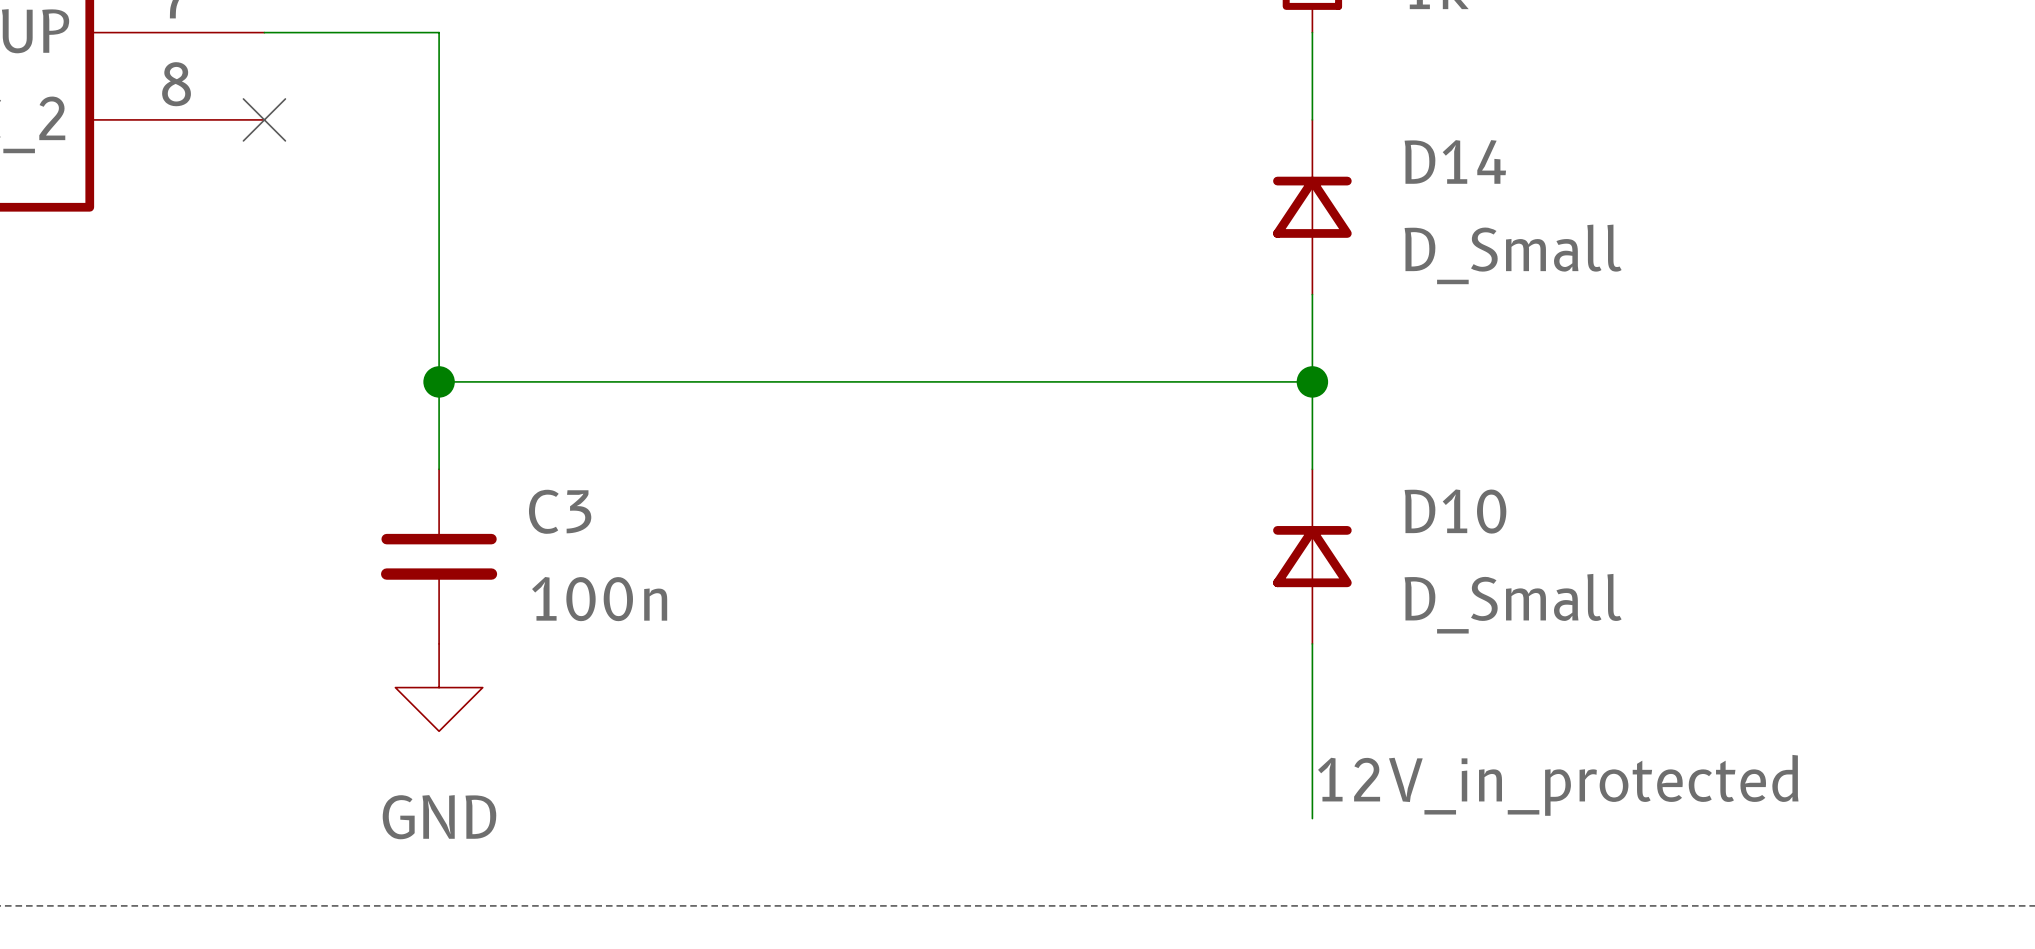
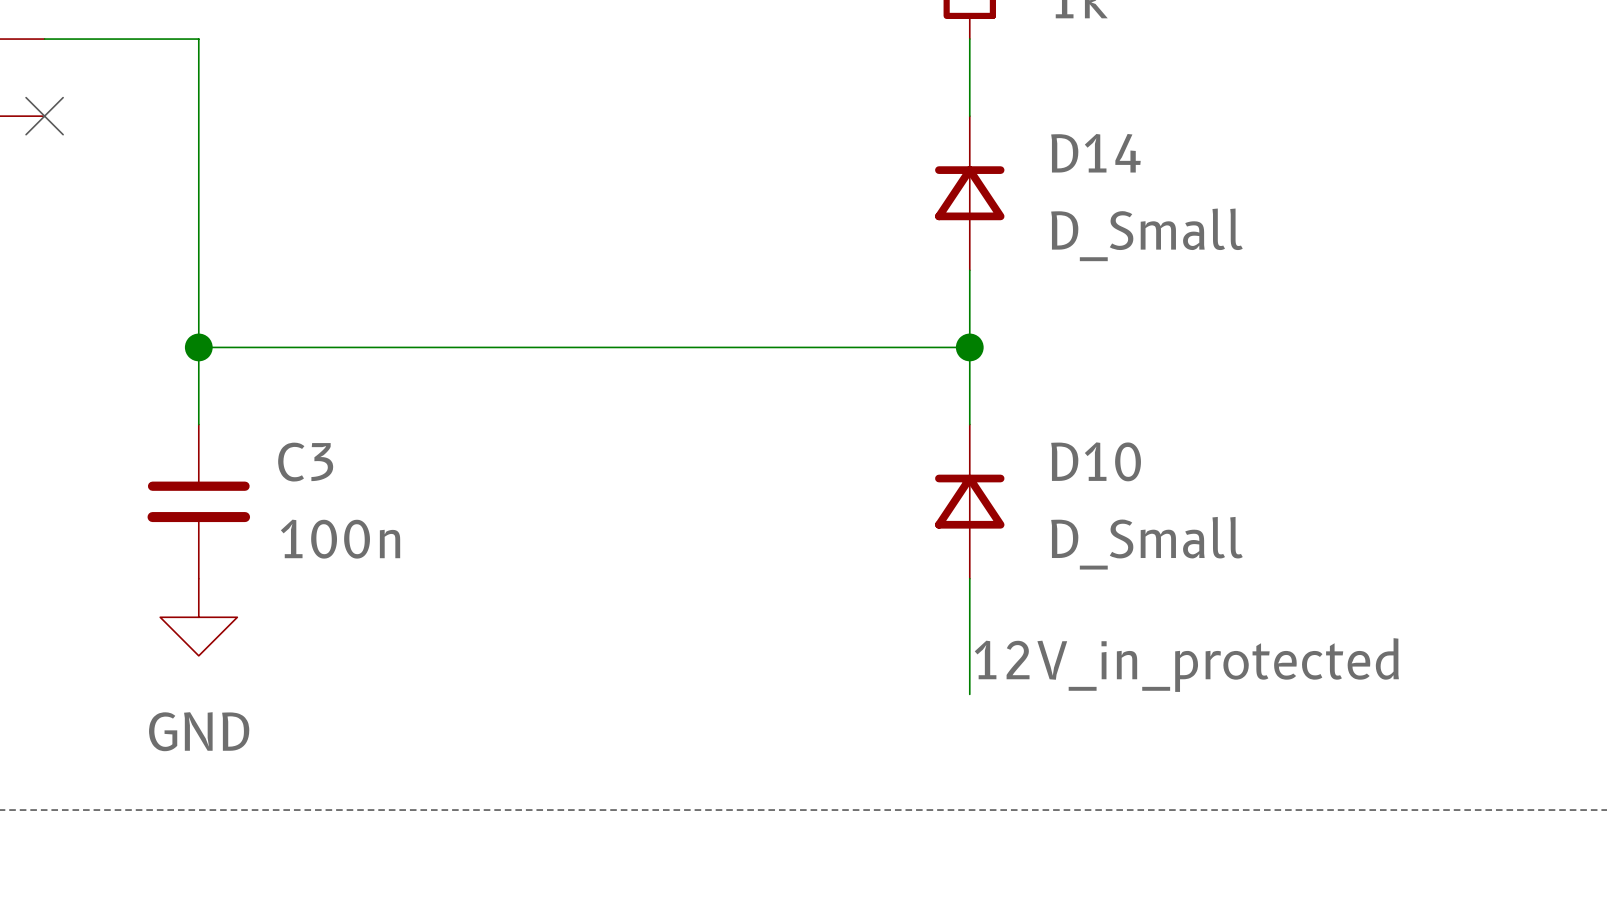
wire: (1312, 774) (1312, 818) -> none
label position: 12V_in_protected (1558, 785) -> 12V_in_protected (1186, 665)

